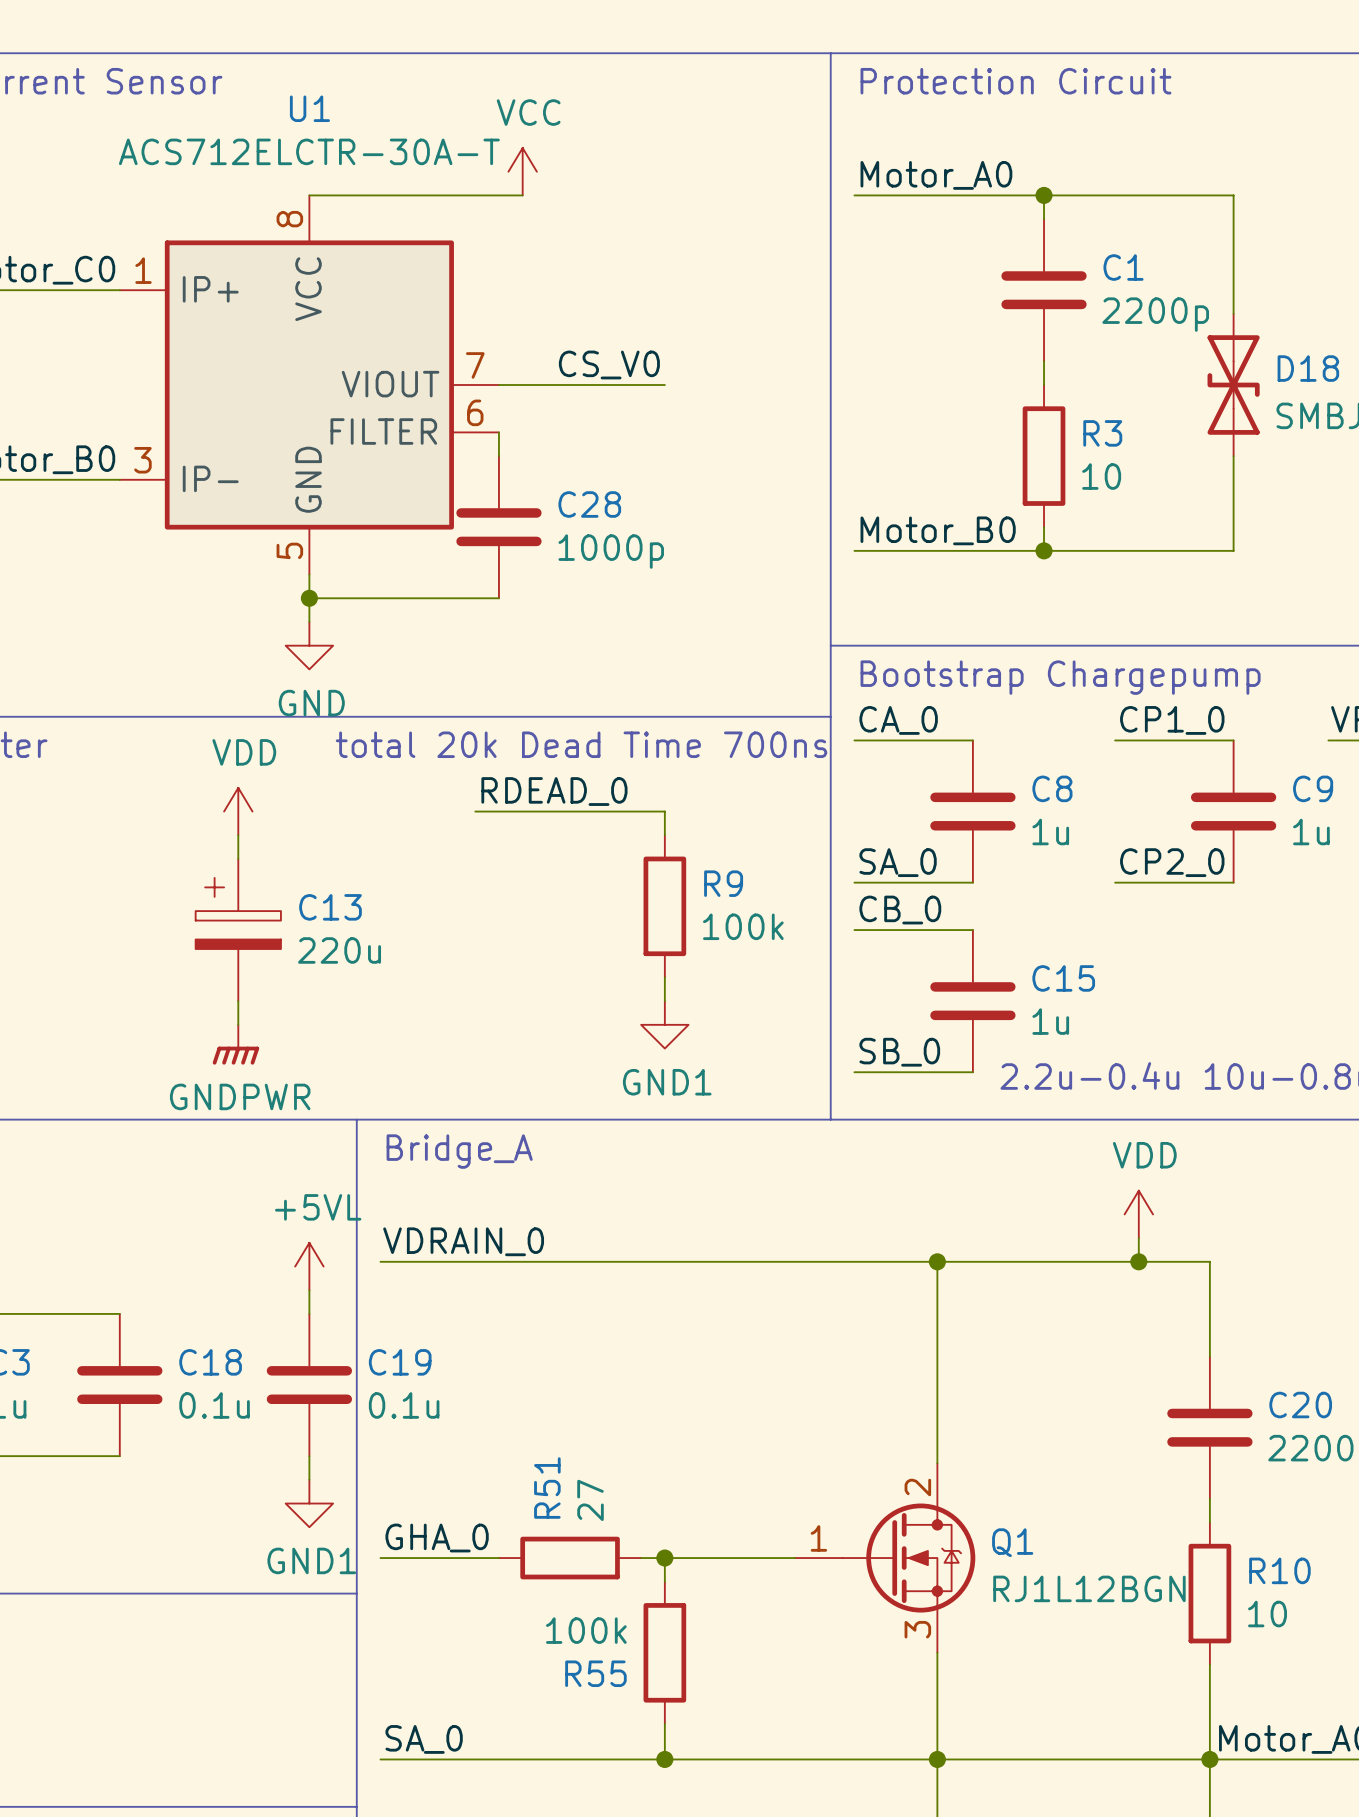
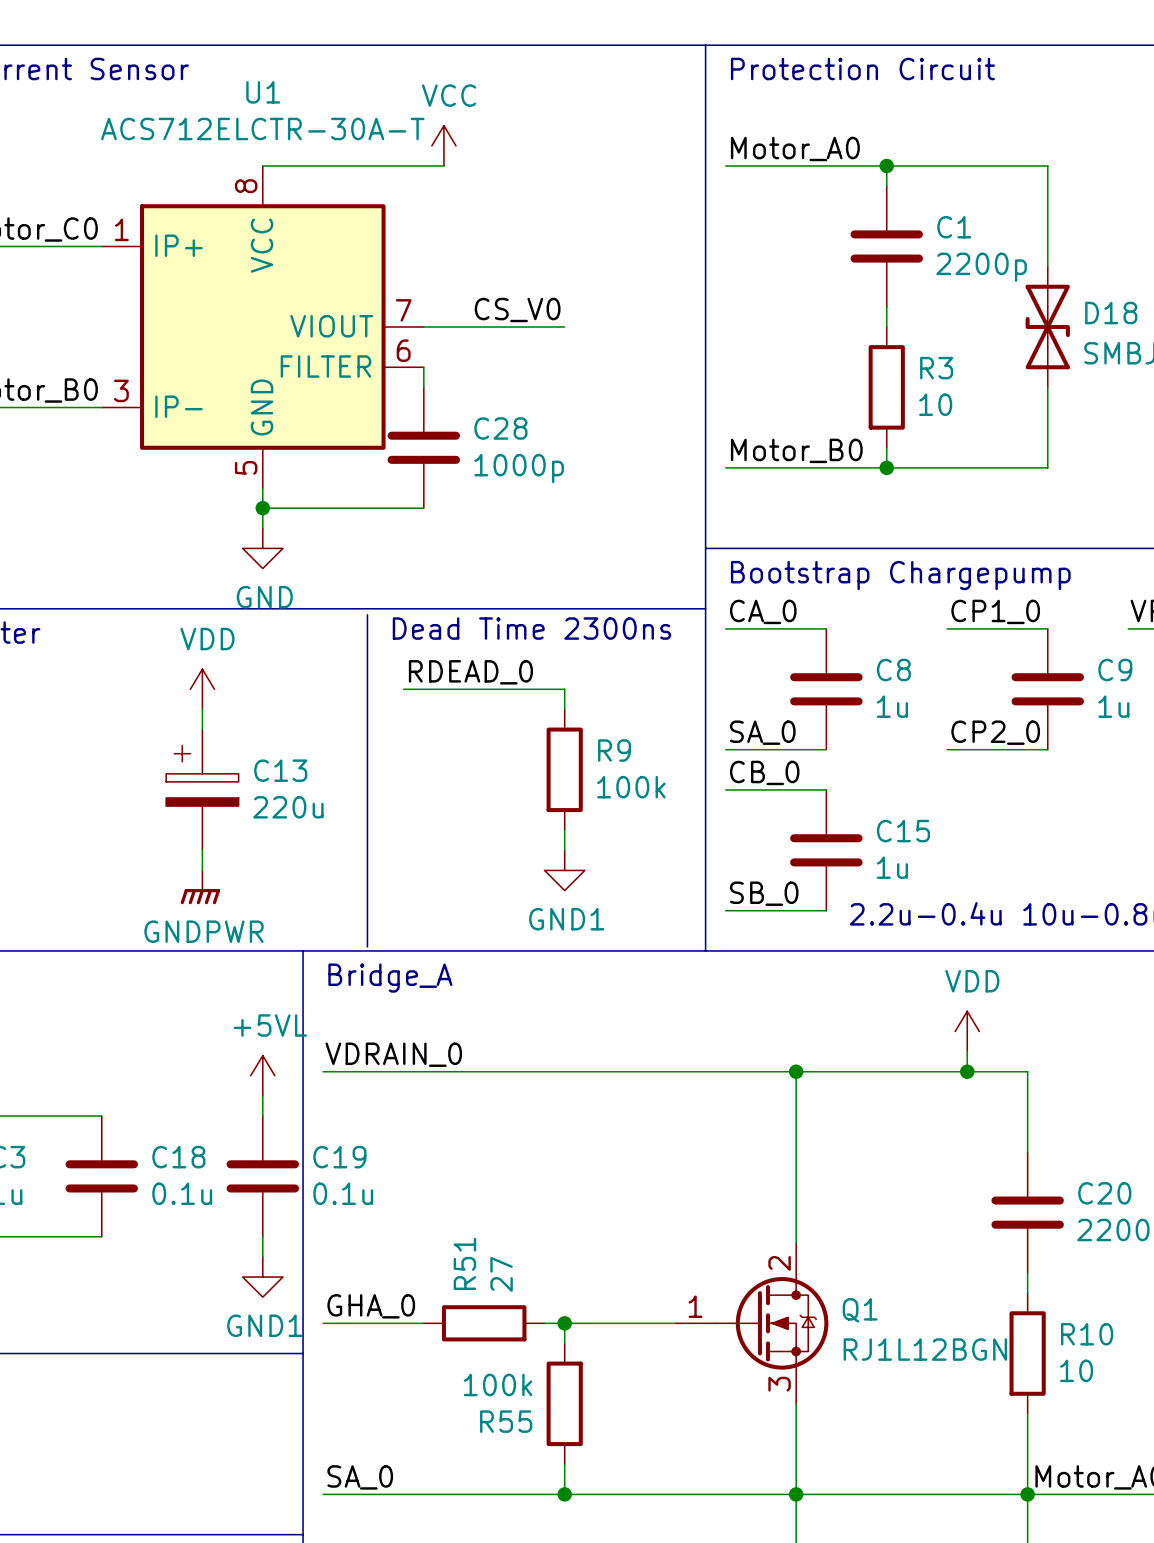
line: none -> (367, 614) (367, 946)
text: total 20k Dead Time 700ns (581, 744) -> Dead Time 2300ns (531, 628)

